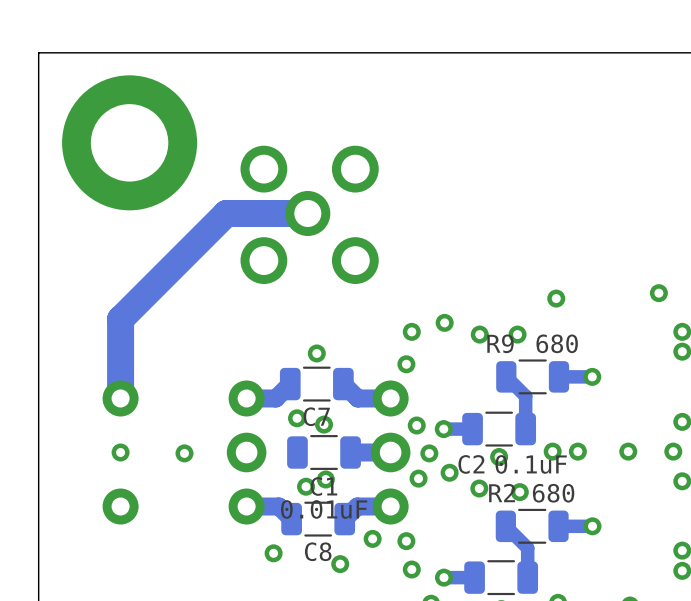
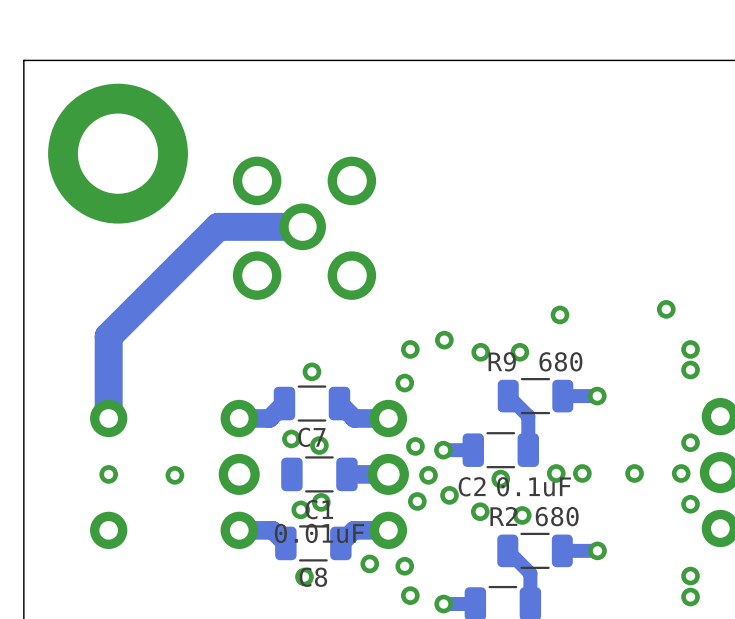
via: none -> (304, 576)
via: (273, 553) -> none
via: (340, 564) -> none

